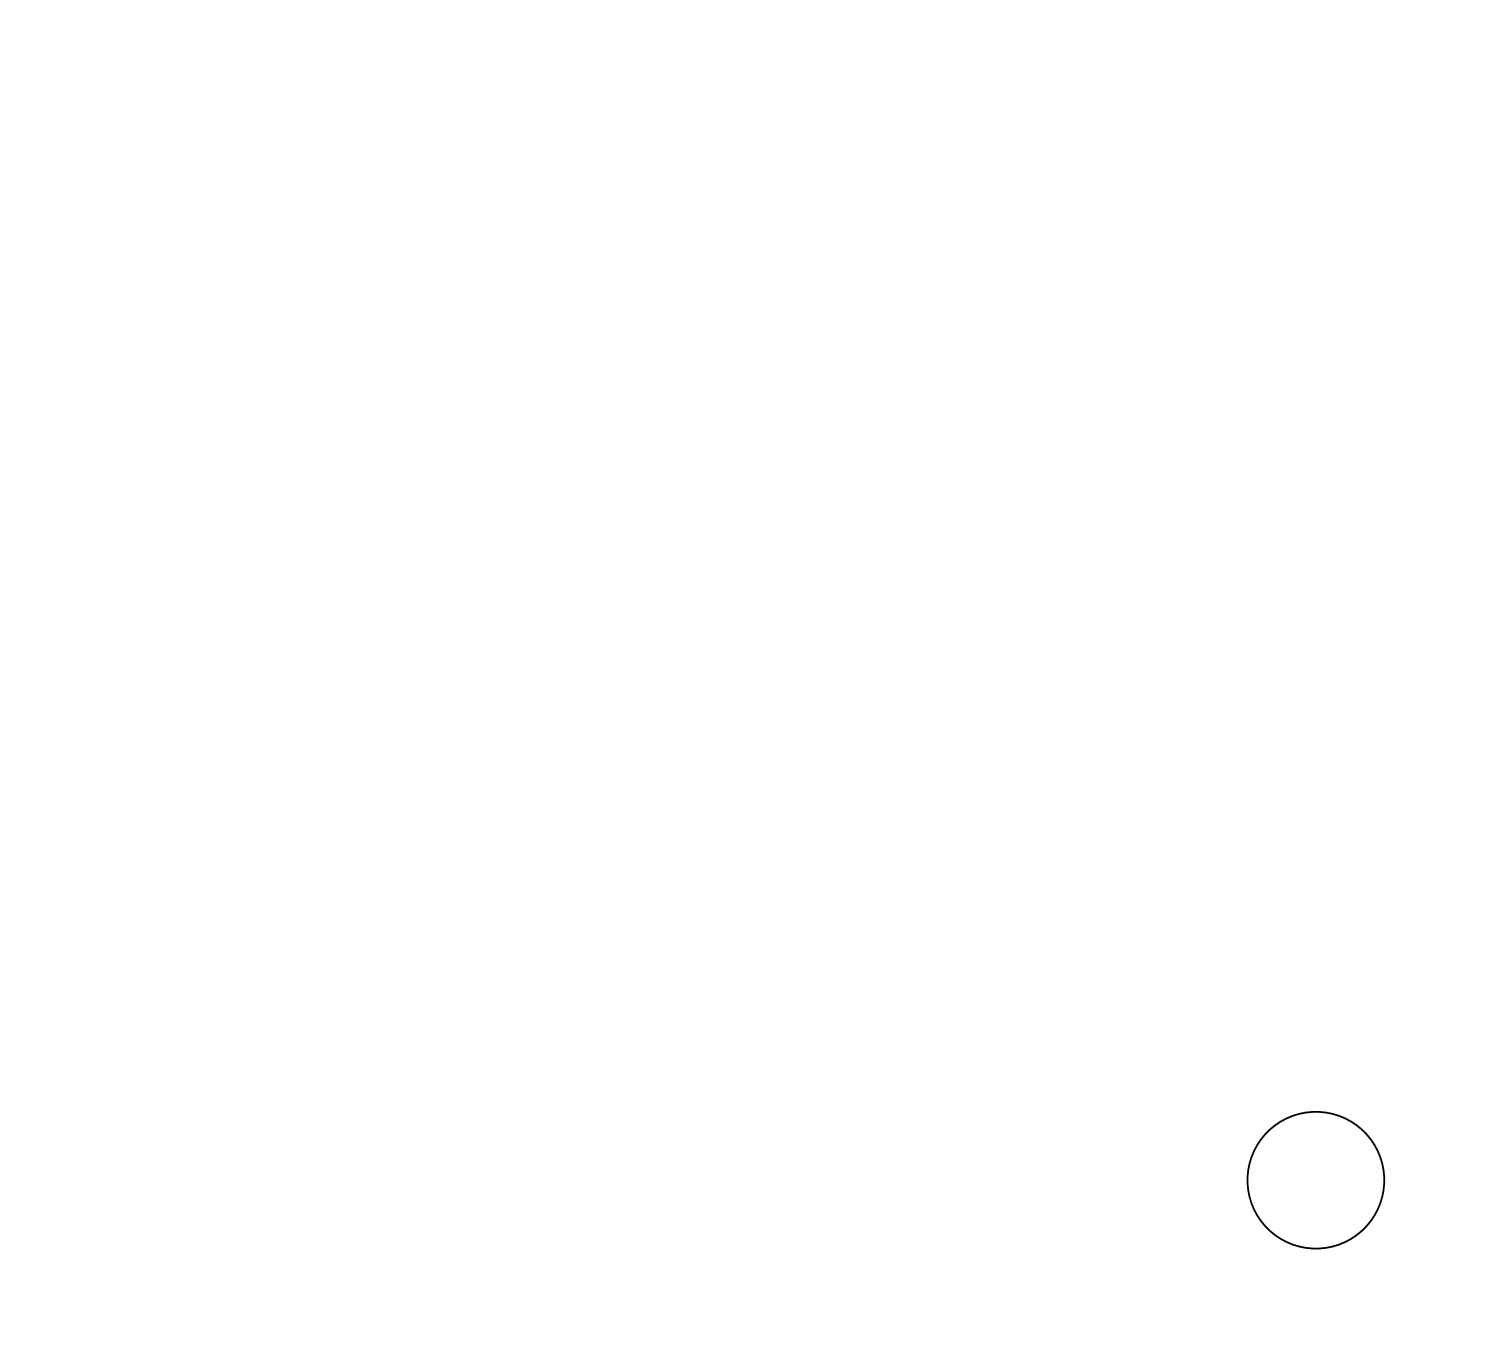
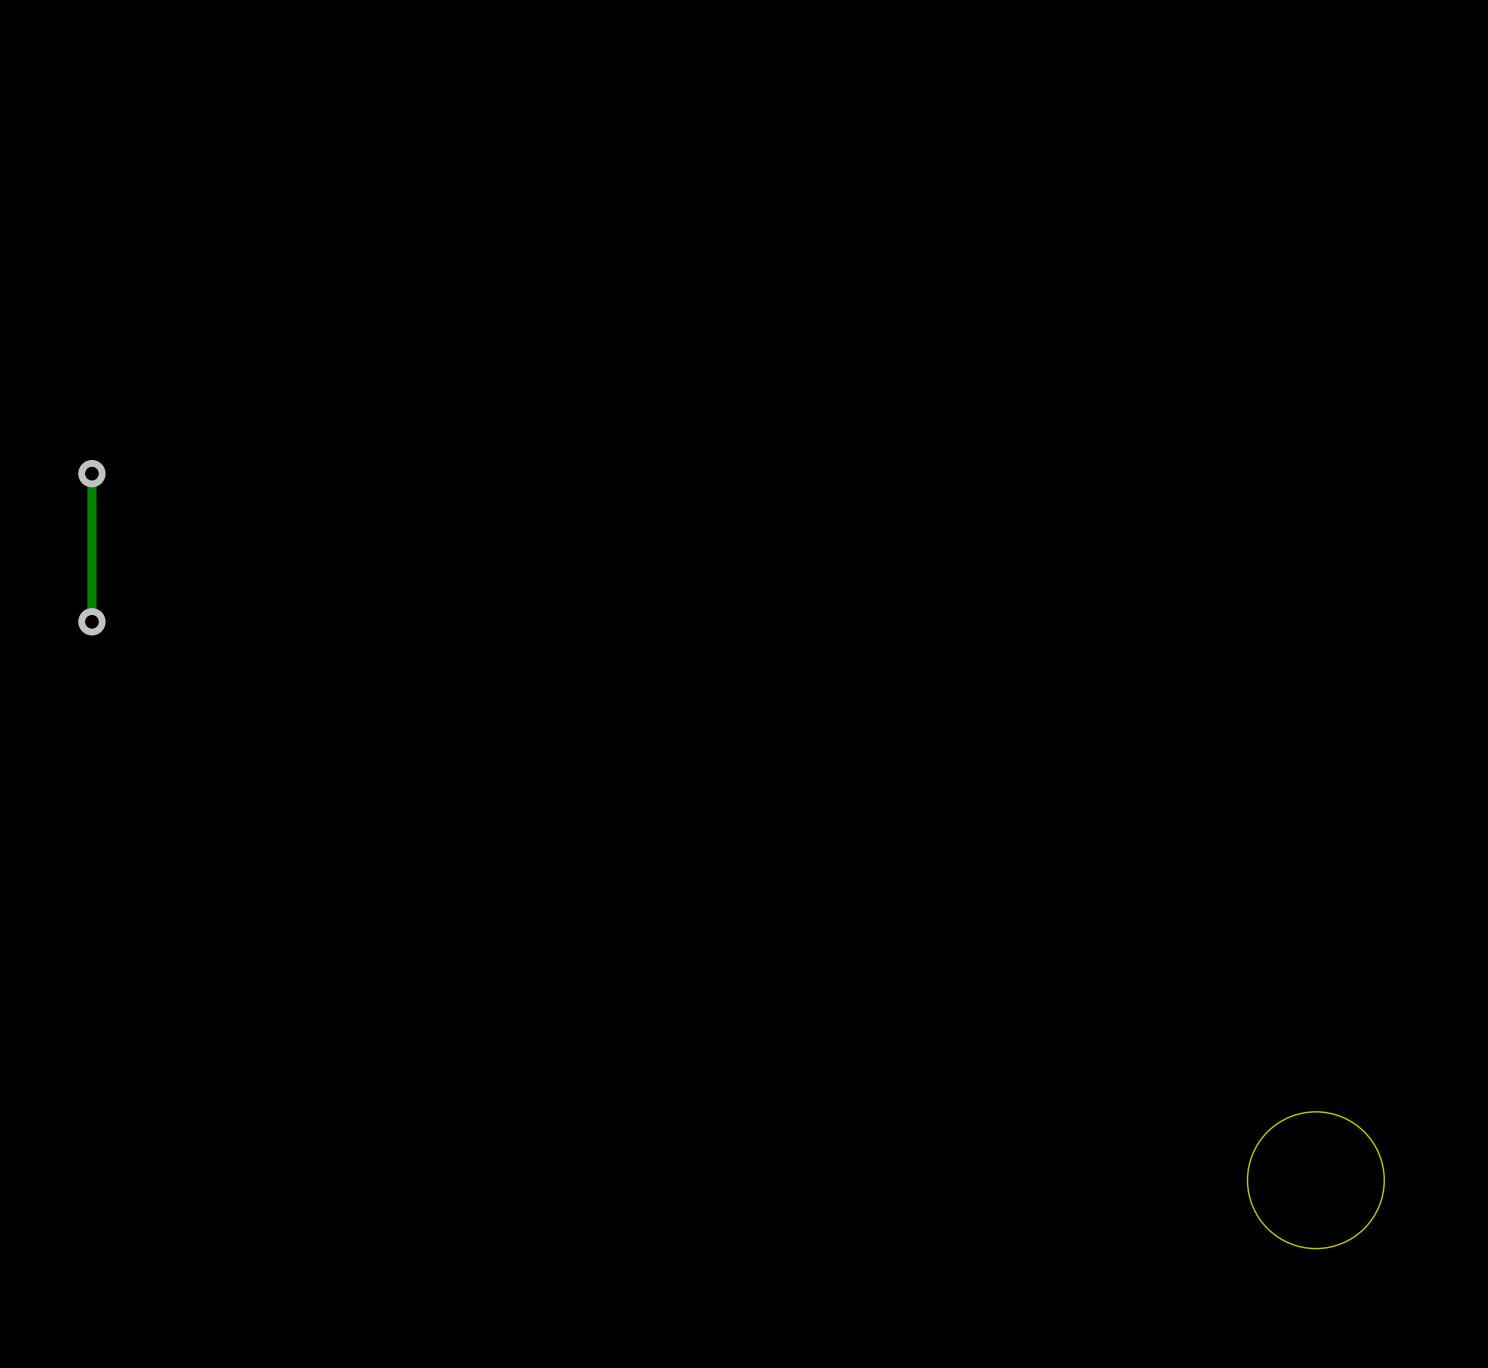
track: none -> (91, 473) (91, 621)
via: none -> (91, 473)
via: none -> (91, 621)

